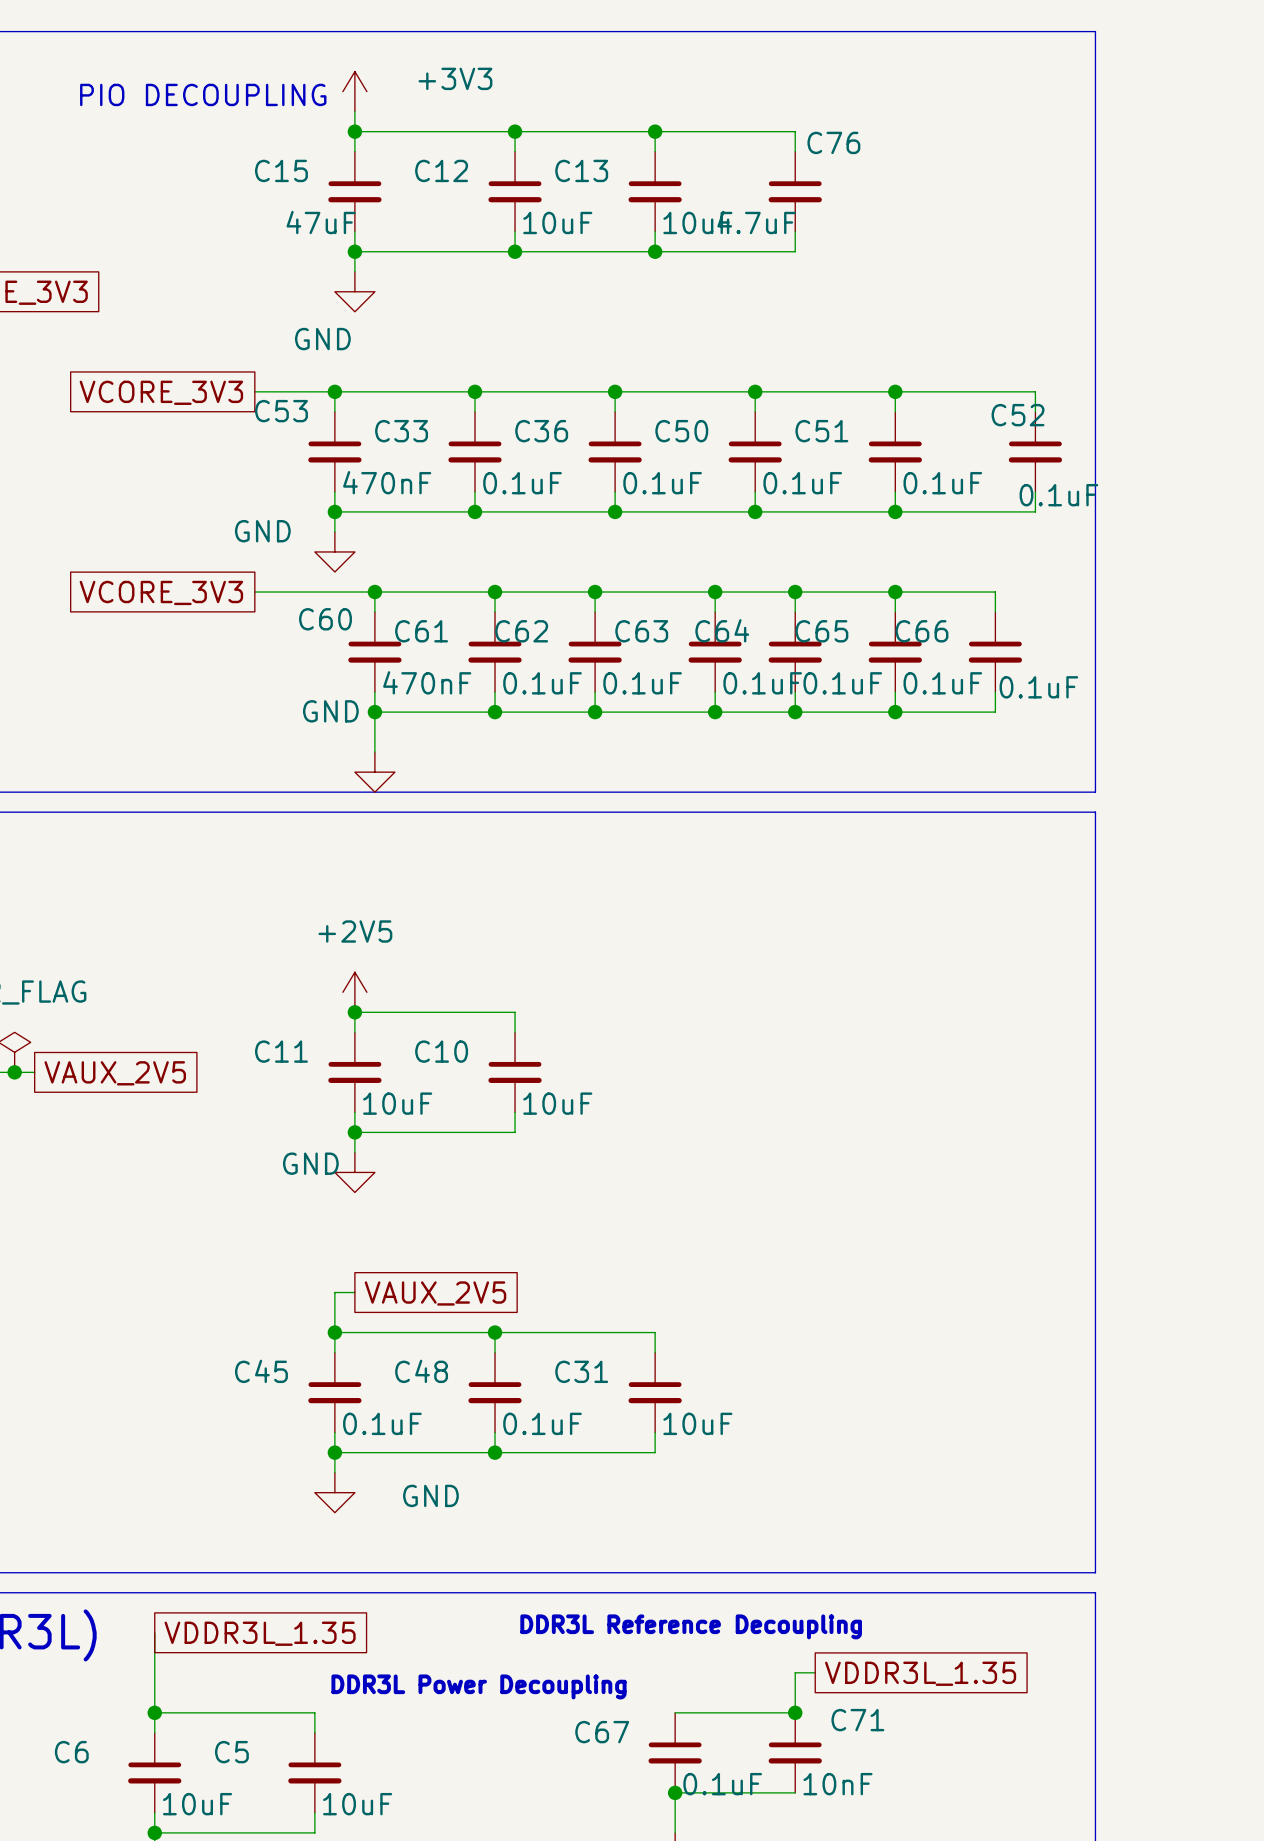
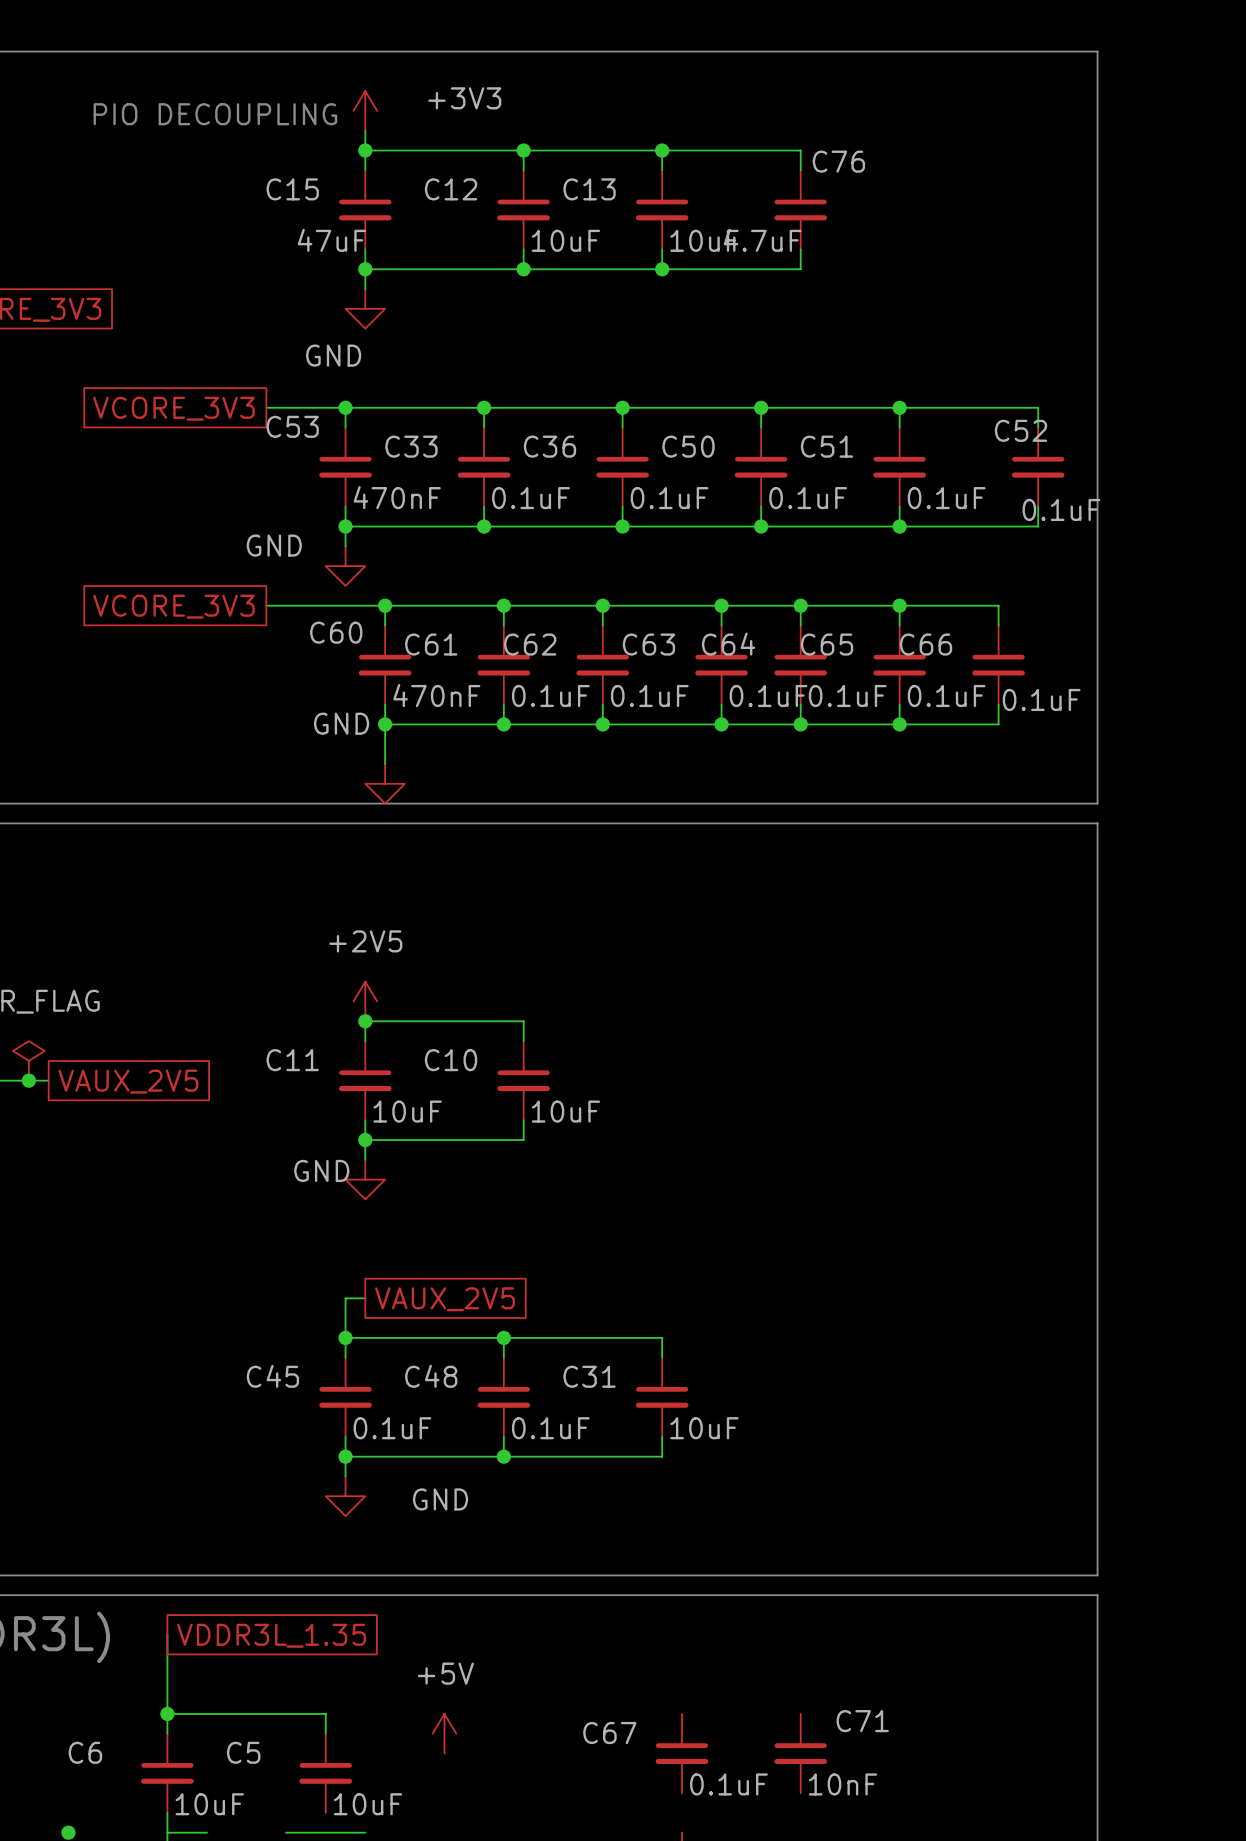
text: DDR3L Reference Decoupling (691, 1626) -> none
wire: (815, 1672) (795, 1672) (795, 1712) (675, 1712) -> none
global label: VDDR3L_1.35 (920, 1673) -> none
text: DDR3L Power Decoupling (478, 1686) -> none
junction: (795, 1712) -> none
power symbol: none -> +5V (444, 1733)
junction: (675, 1792) -> none
wire: (795, 1792) (675, 1792) (675, 1832) -> none
wire: (314, 1812) (314, 1832) -> (365, 1832) (325, 1832)
junction: none -> (68, 1832)
junction: (154, 1832) -> none
wire: (194, 1832) (274, 1832) -> none

